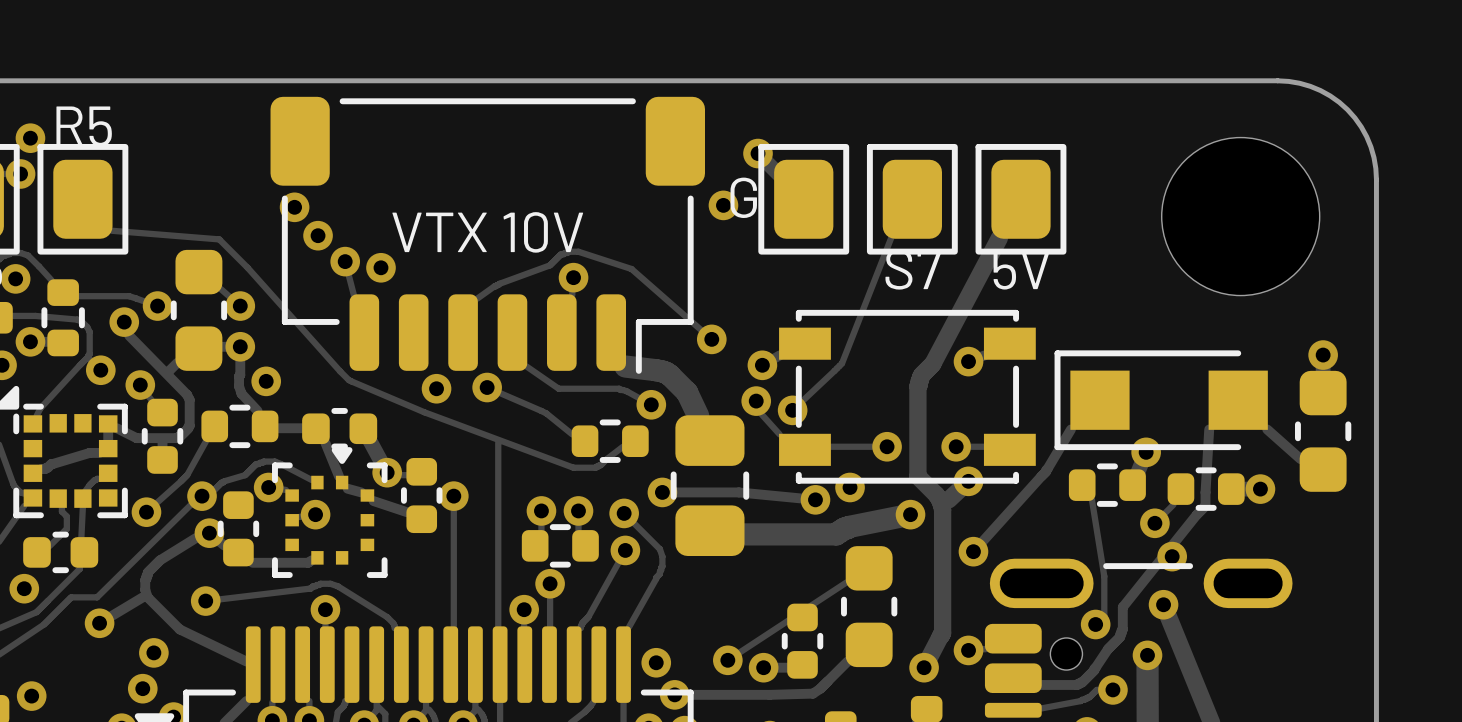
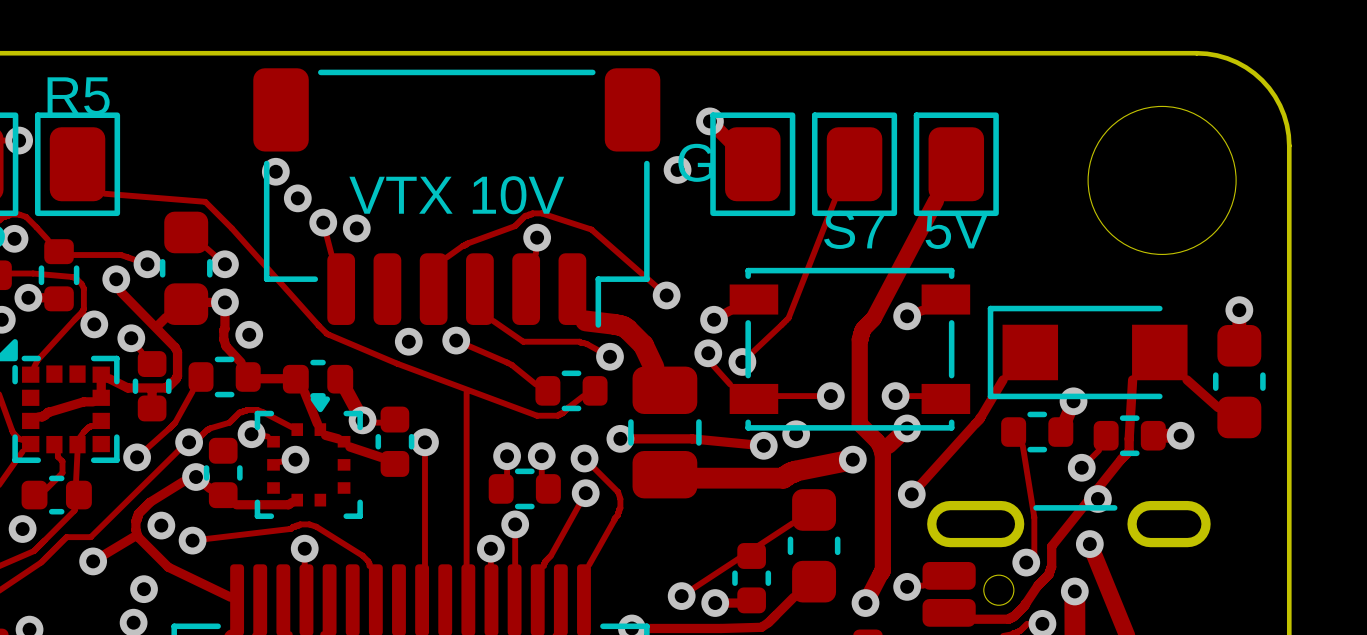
via: (30, 138) -> none
via: none -> (161, 525)
via: (656, 662) -> none

